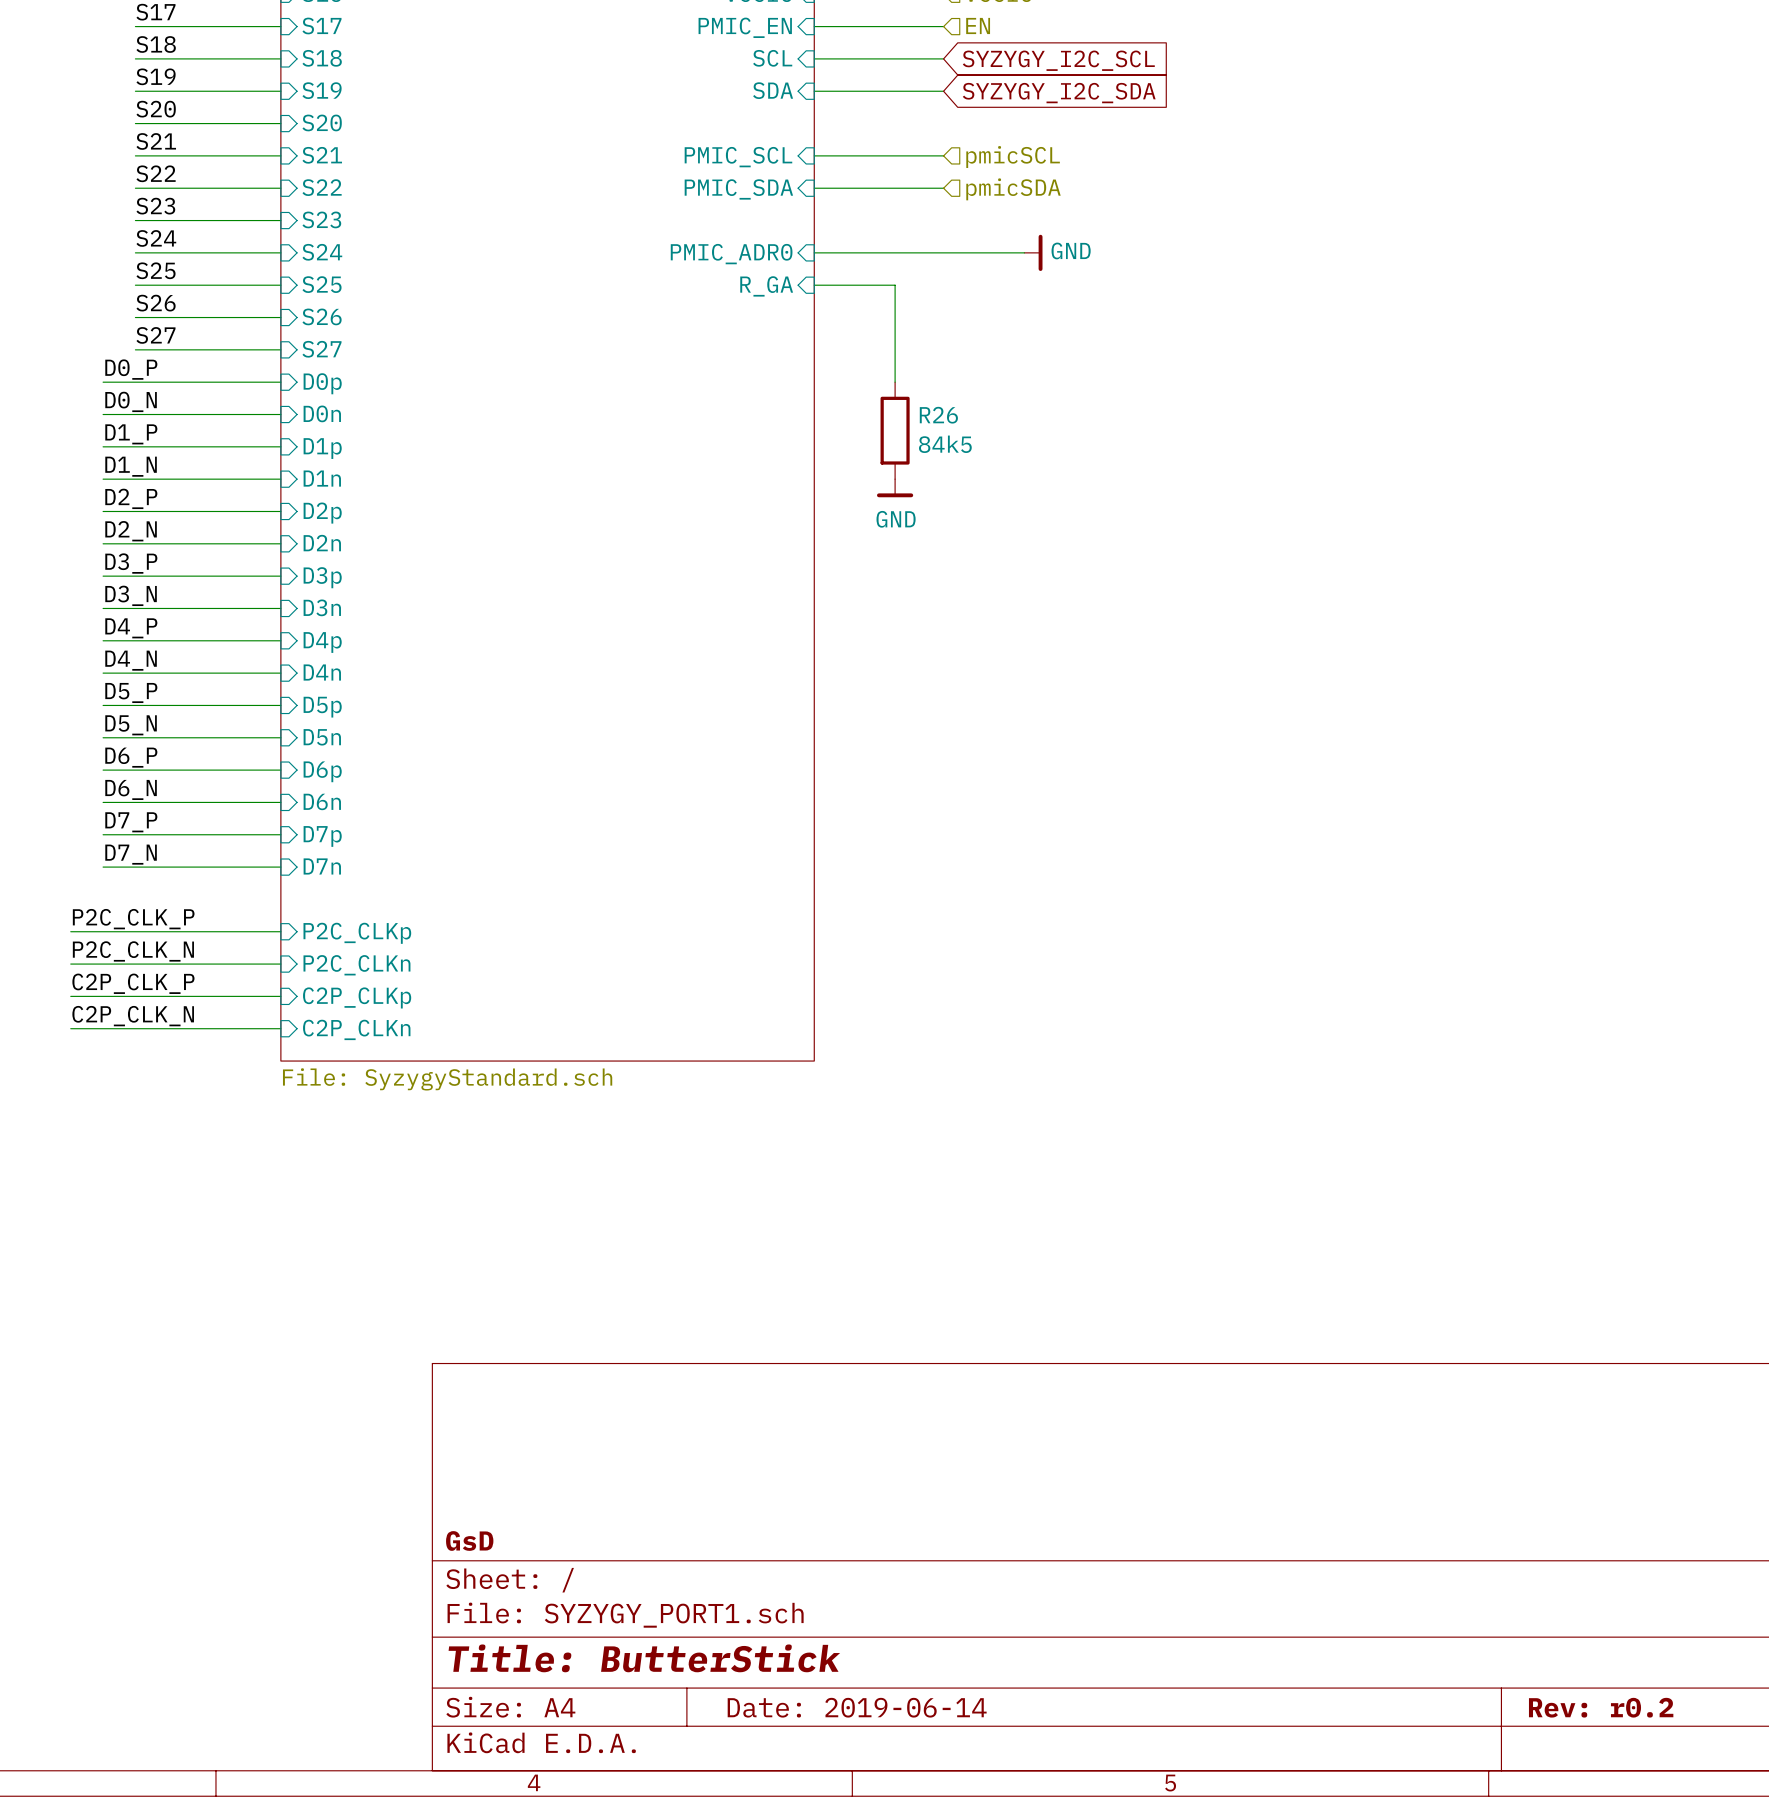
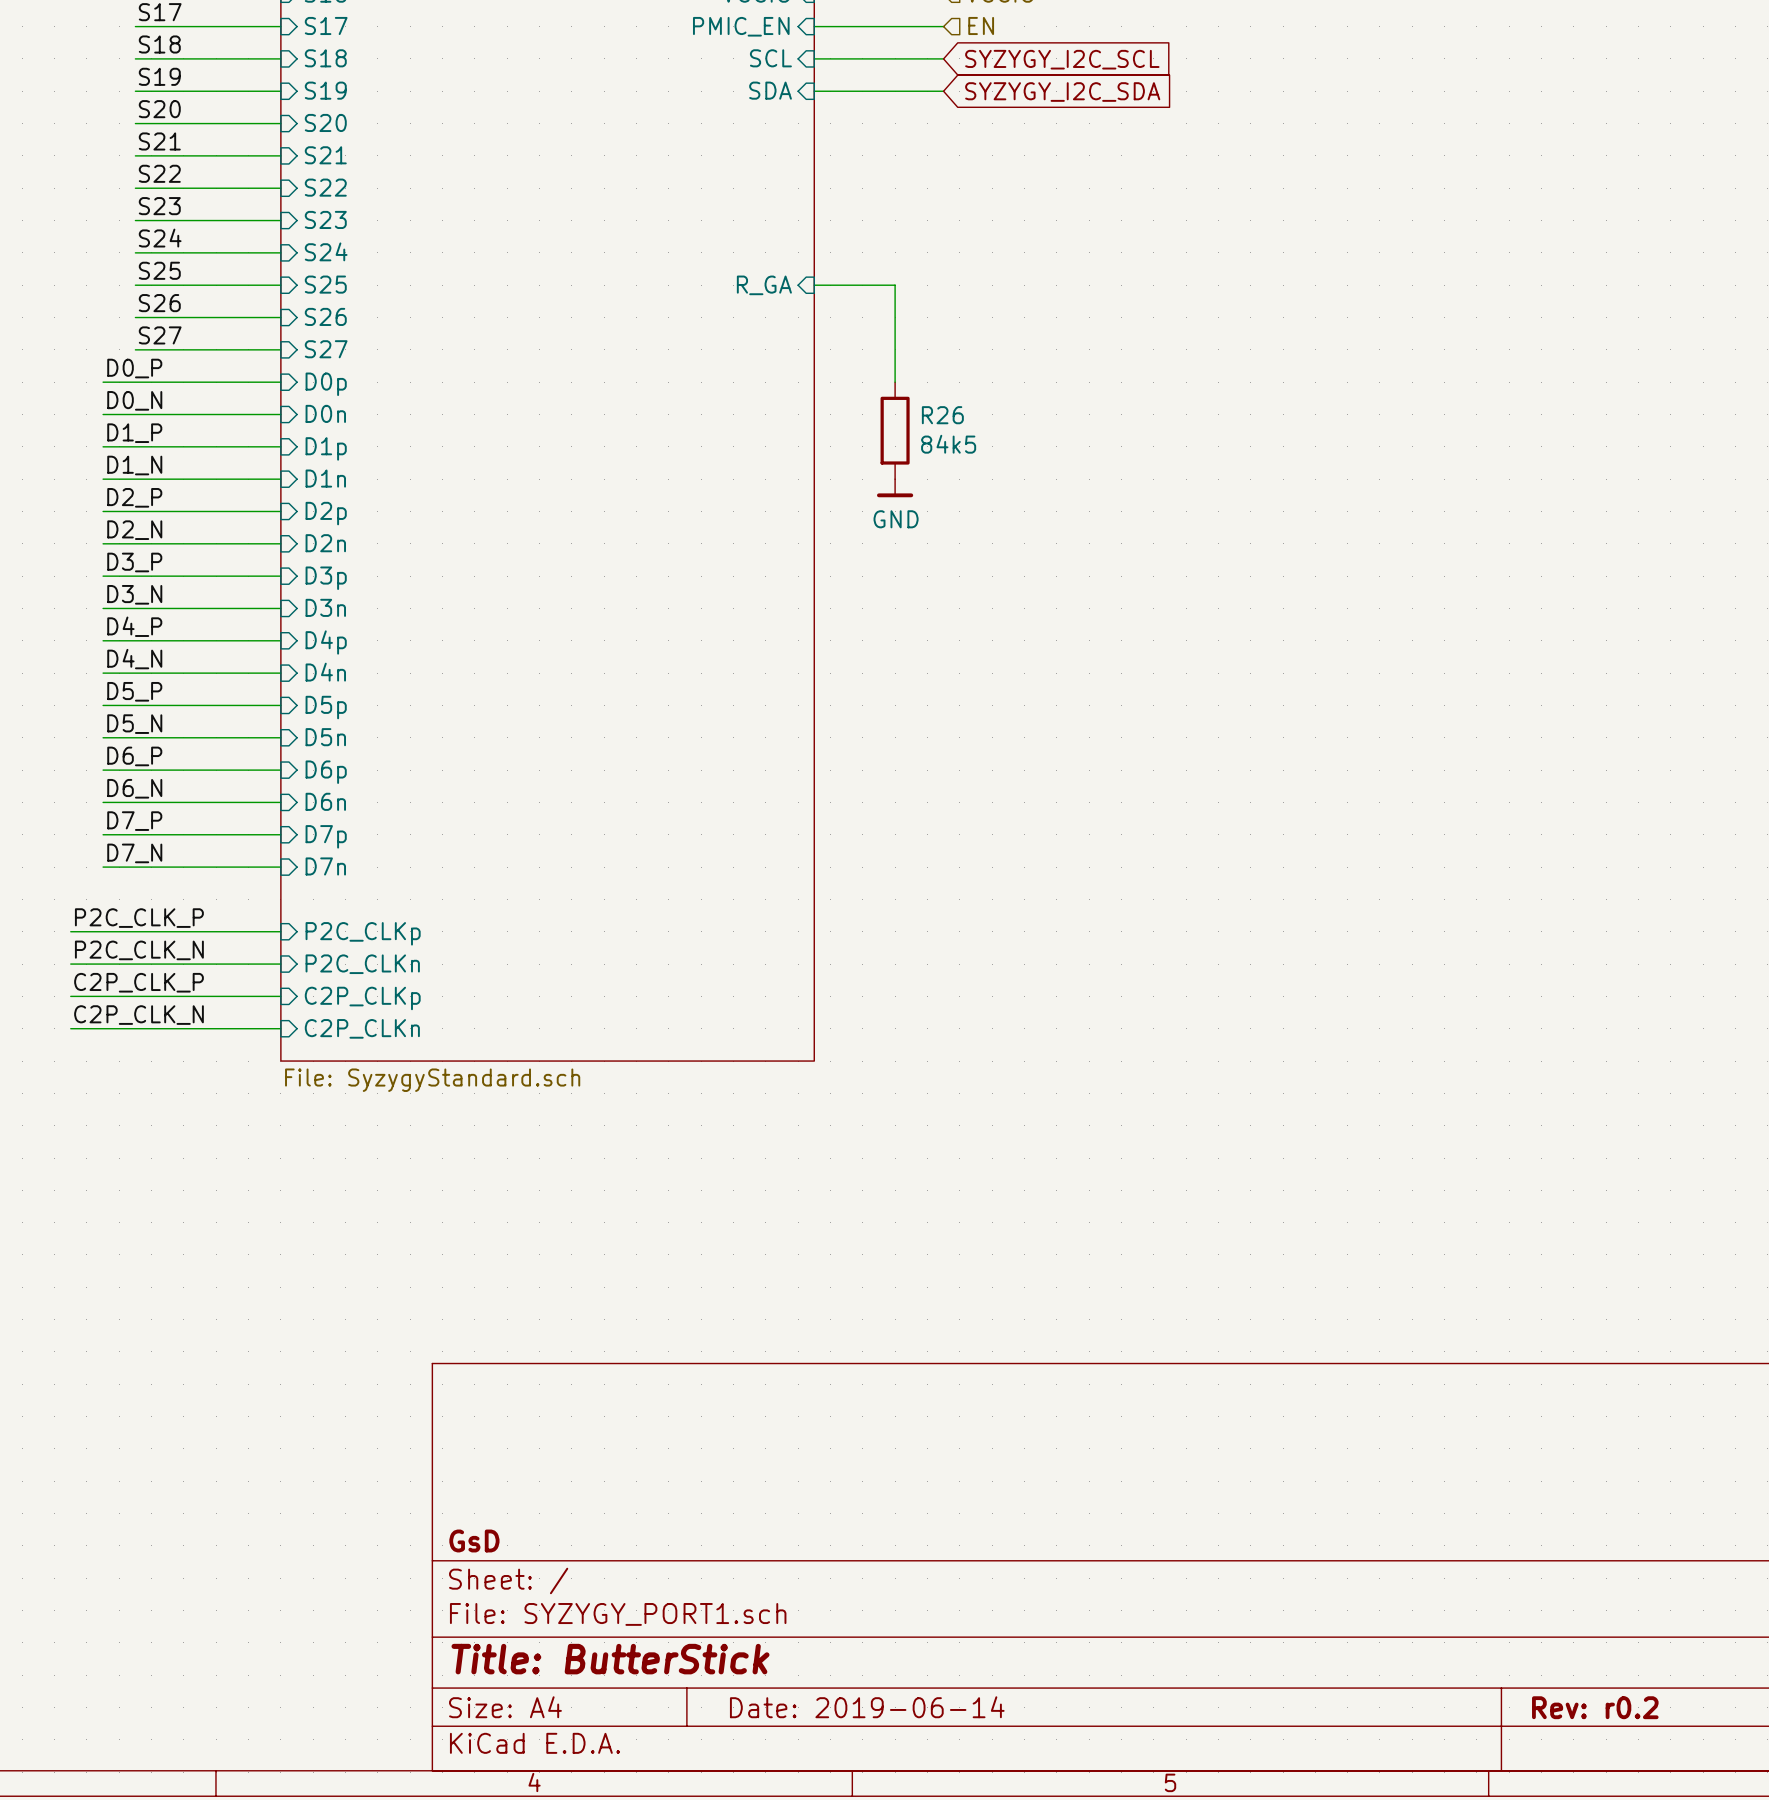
wire: (814, 155) (943, 155) -> none
sheet pin: PMIC_SCL (738, 157) -> none
hierarchical label: pmicSCL (1013, 157) -> none
wire: (814, 188) (943, 188) -> none
sheet pin: PMIC_SDA (738, 189) -> none
hierarchical label: pmicSDA (1013, 189) -> none
wire: (814, 252) (1024, 252) -> none
power symbol: GND (1033, 252) -> none
sheet pin: PMIC_ADR0 (731, 254) -> none

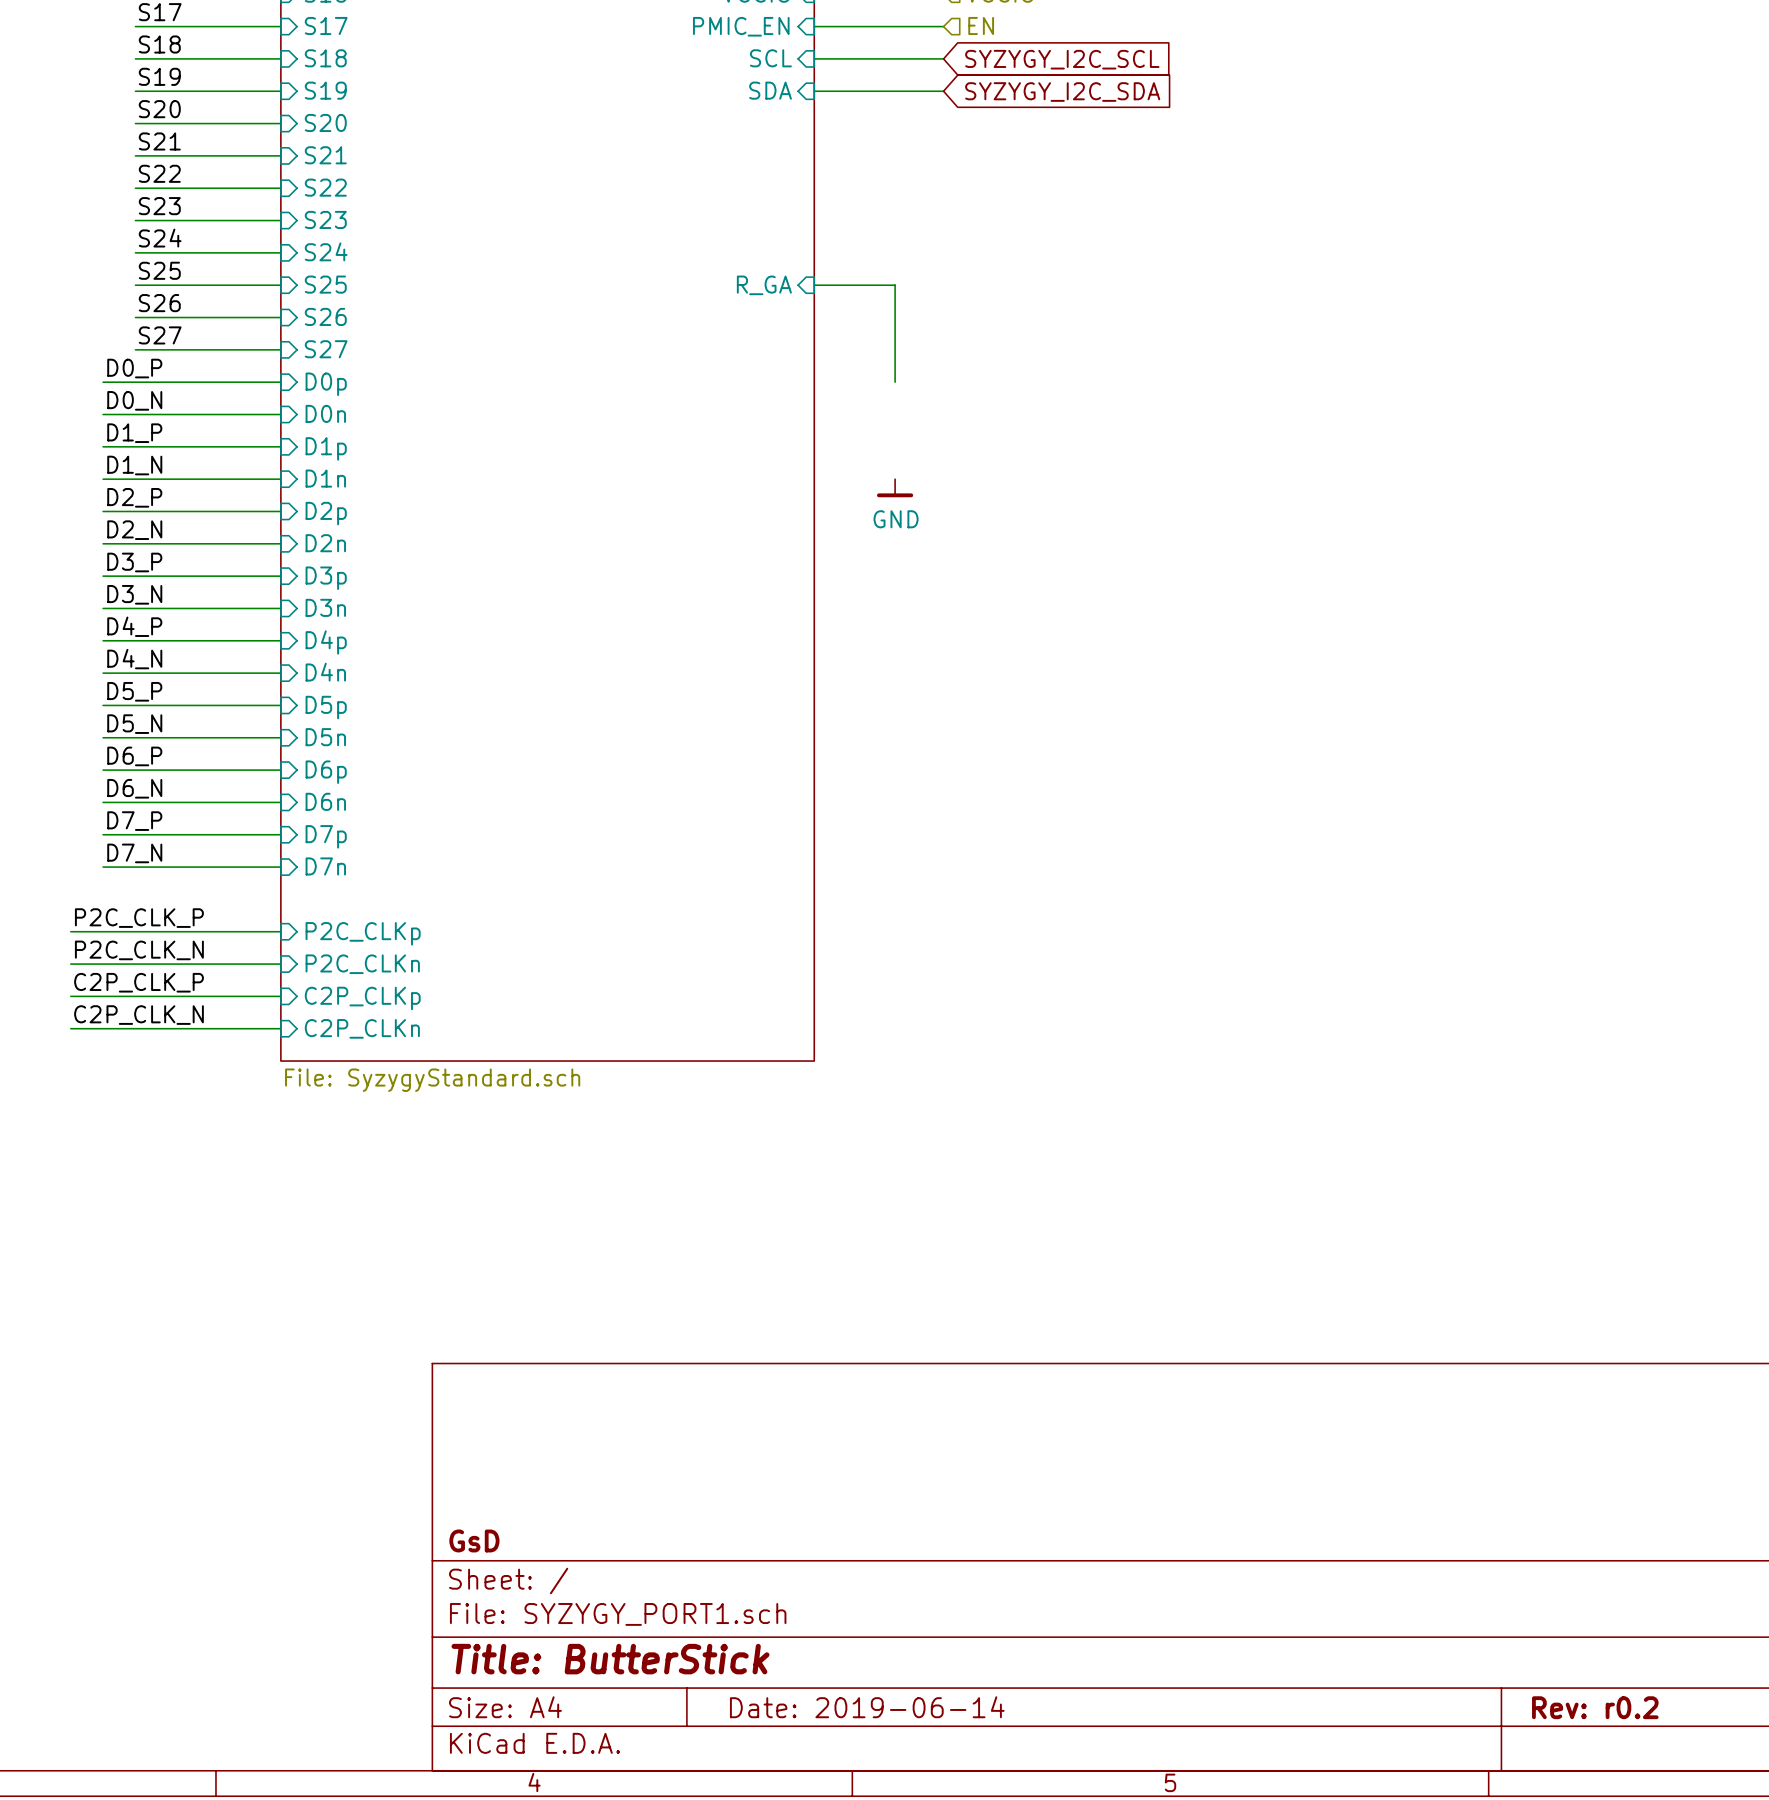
R26: 84k5 (895, 430) -> none

